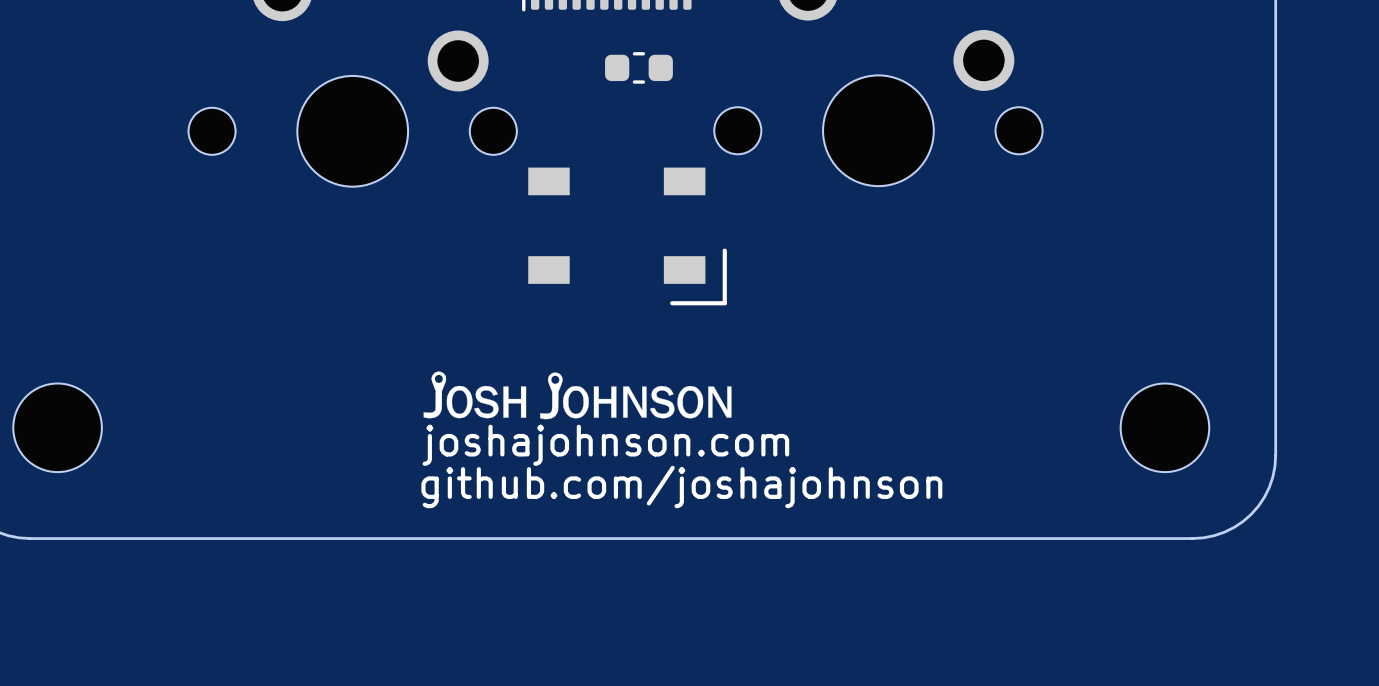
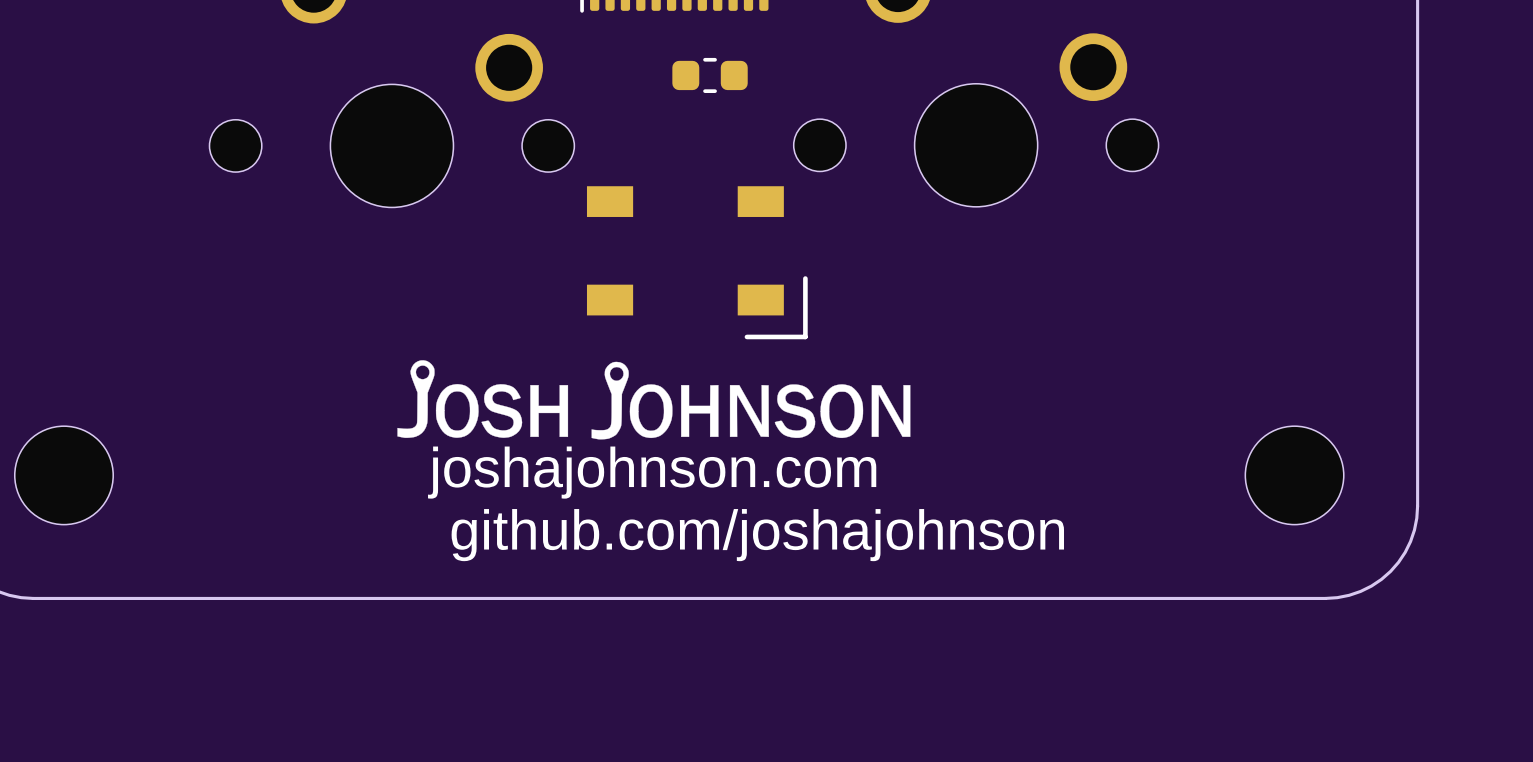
drawing: none -> [397, 360, 911, 440]
drawing: [423, 371, 732, 420] -> none
drawing shape: [421, 424, 943, 509] -> [428, 446, 1065, 562]

